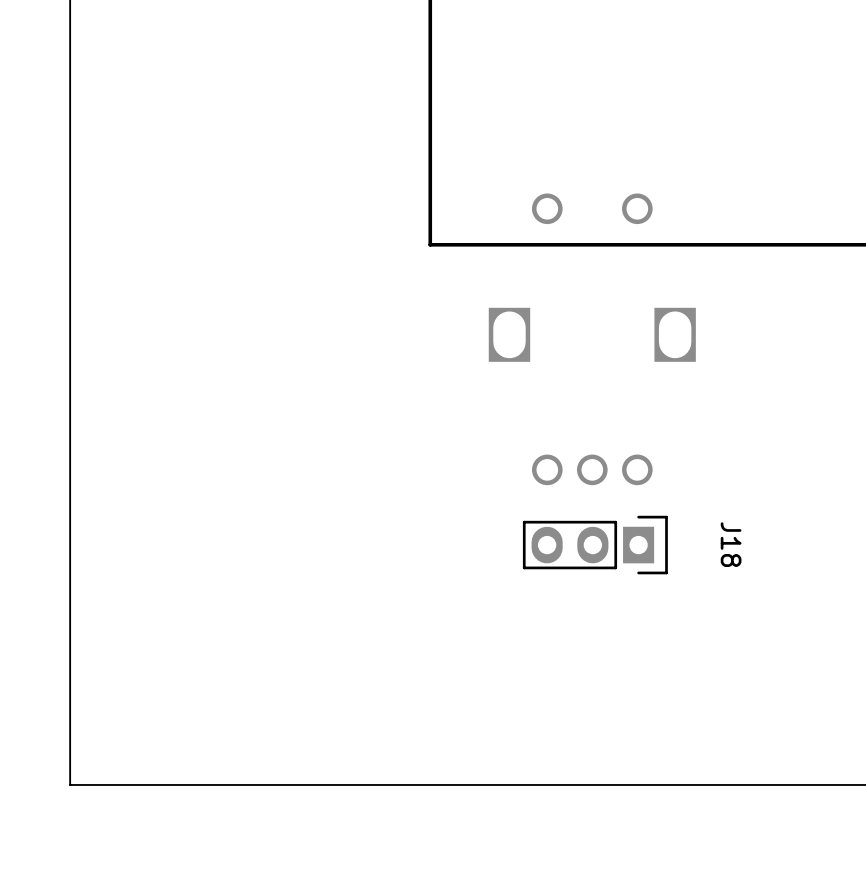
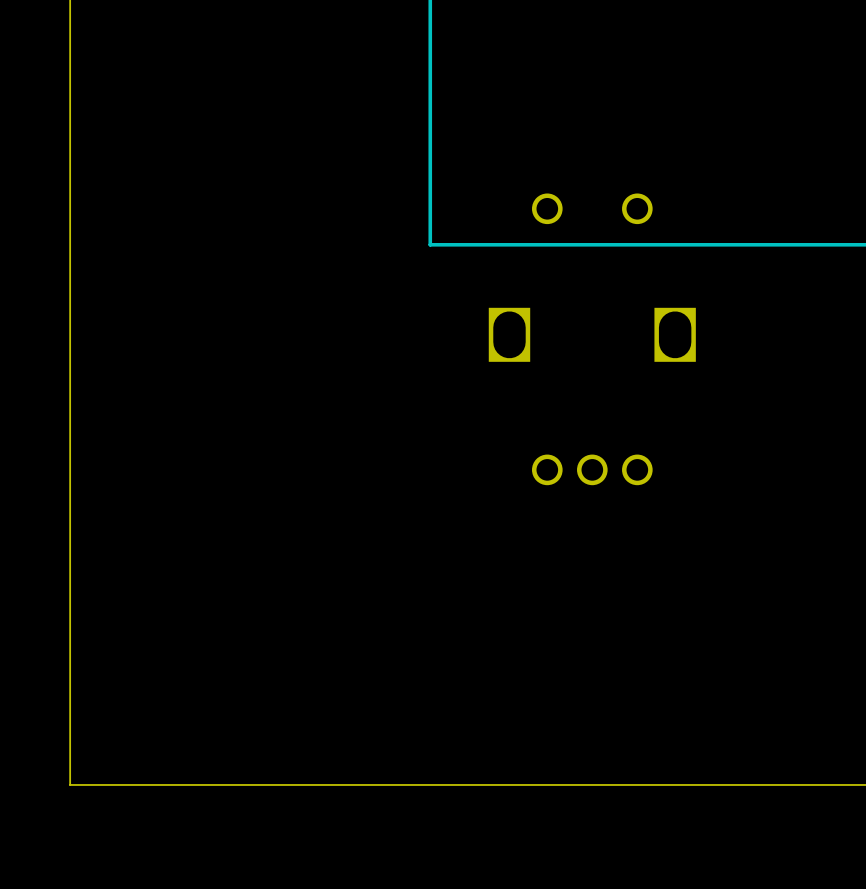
J18: (595, 545) -> none

